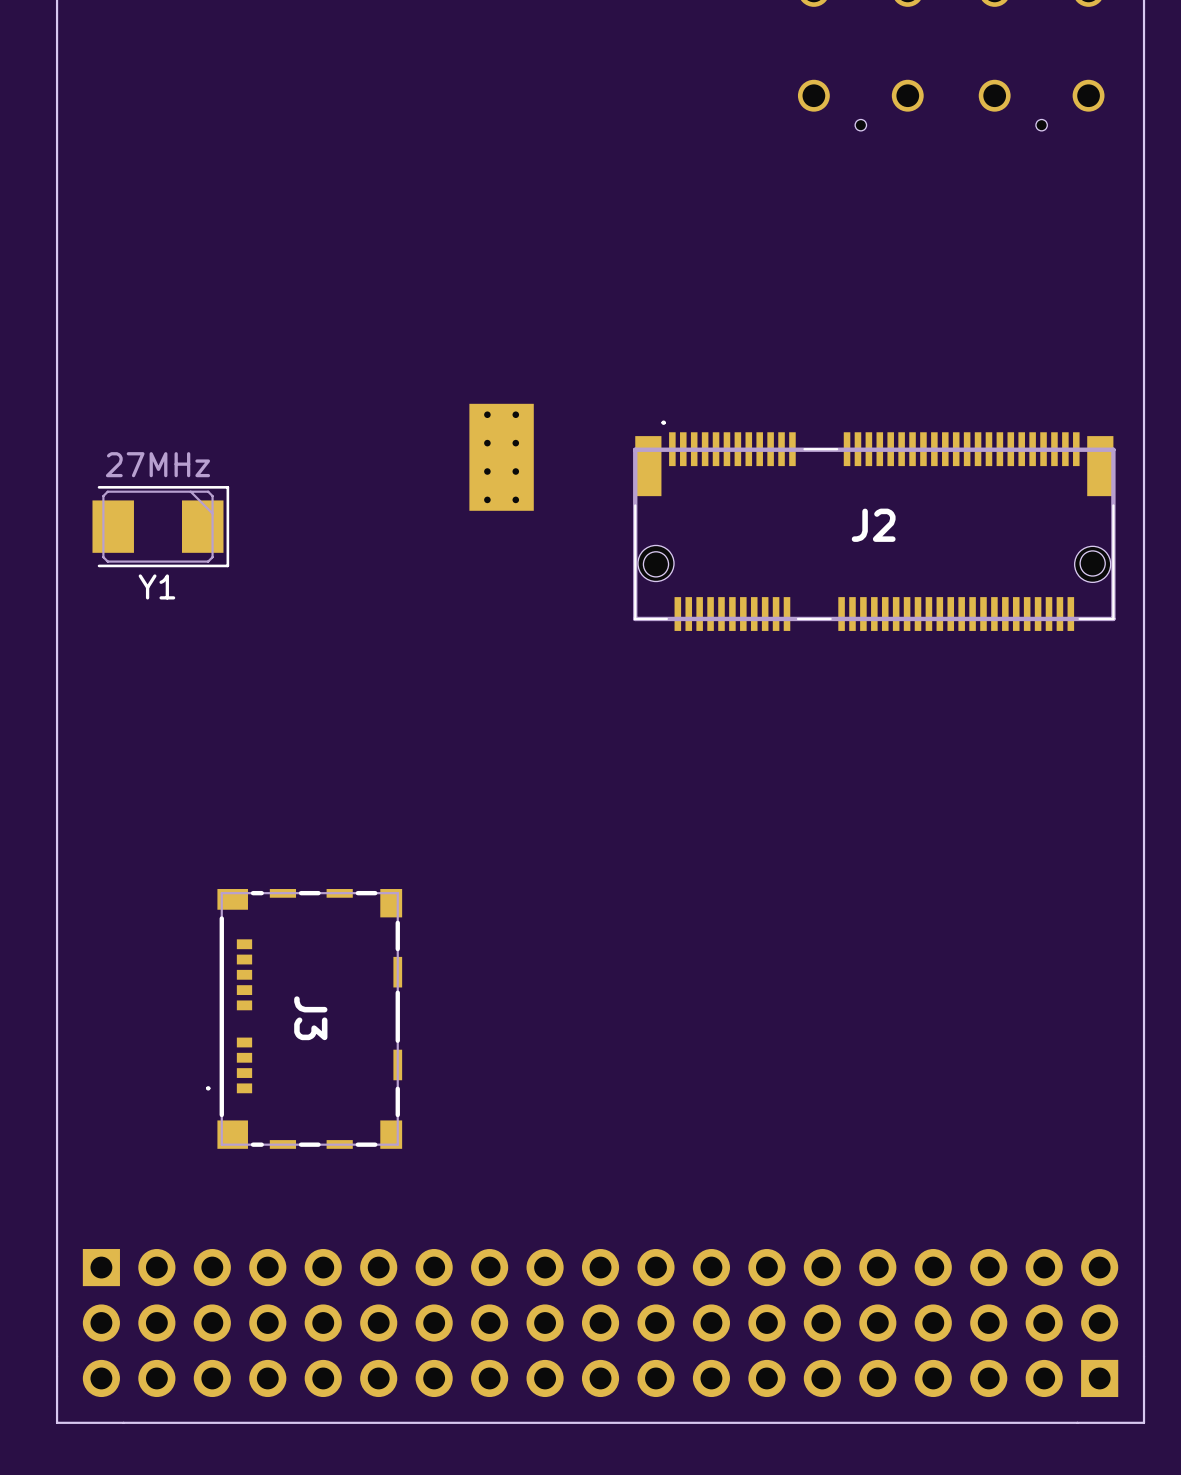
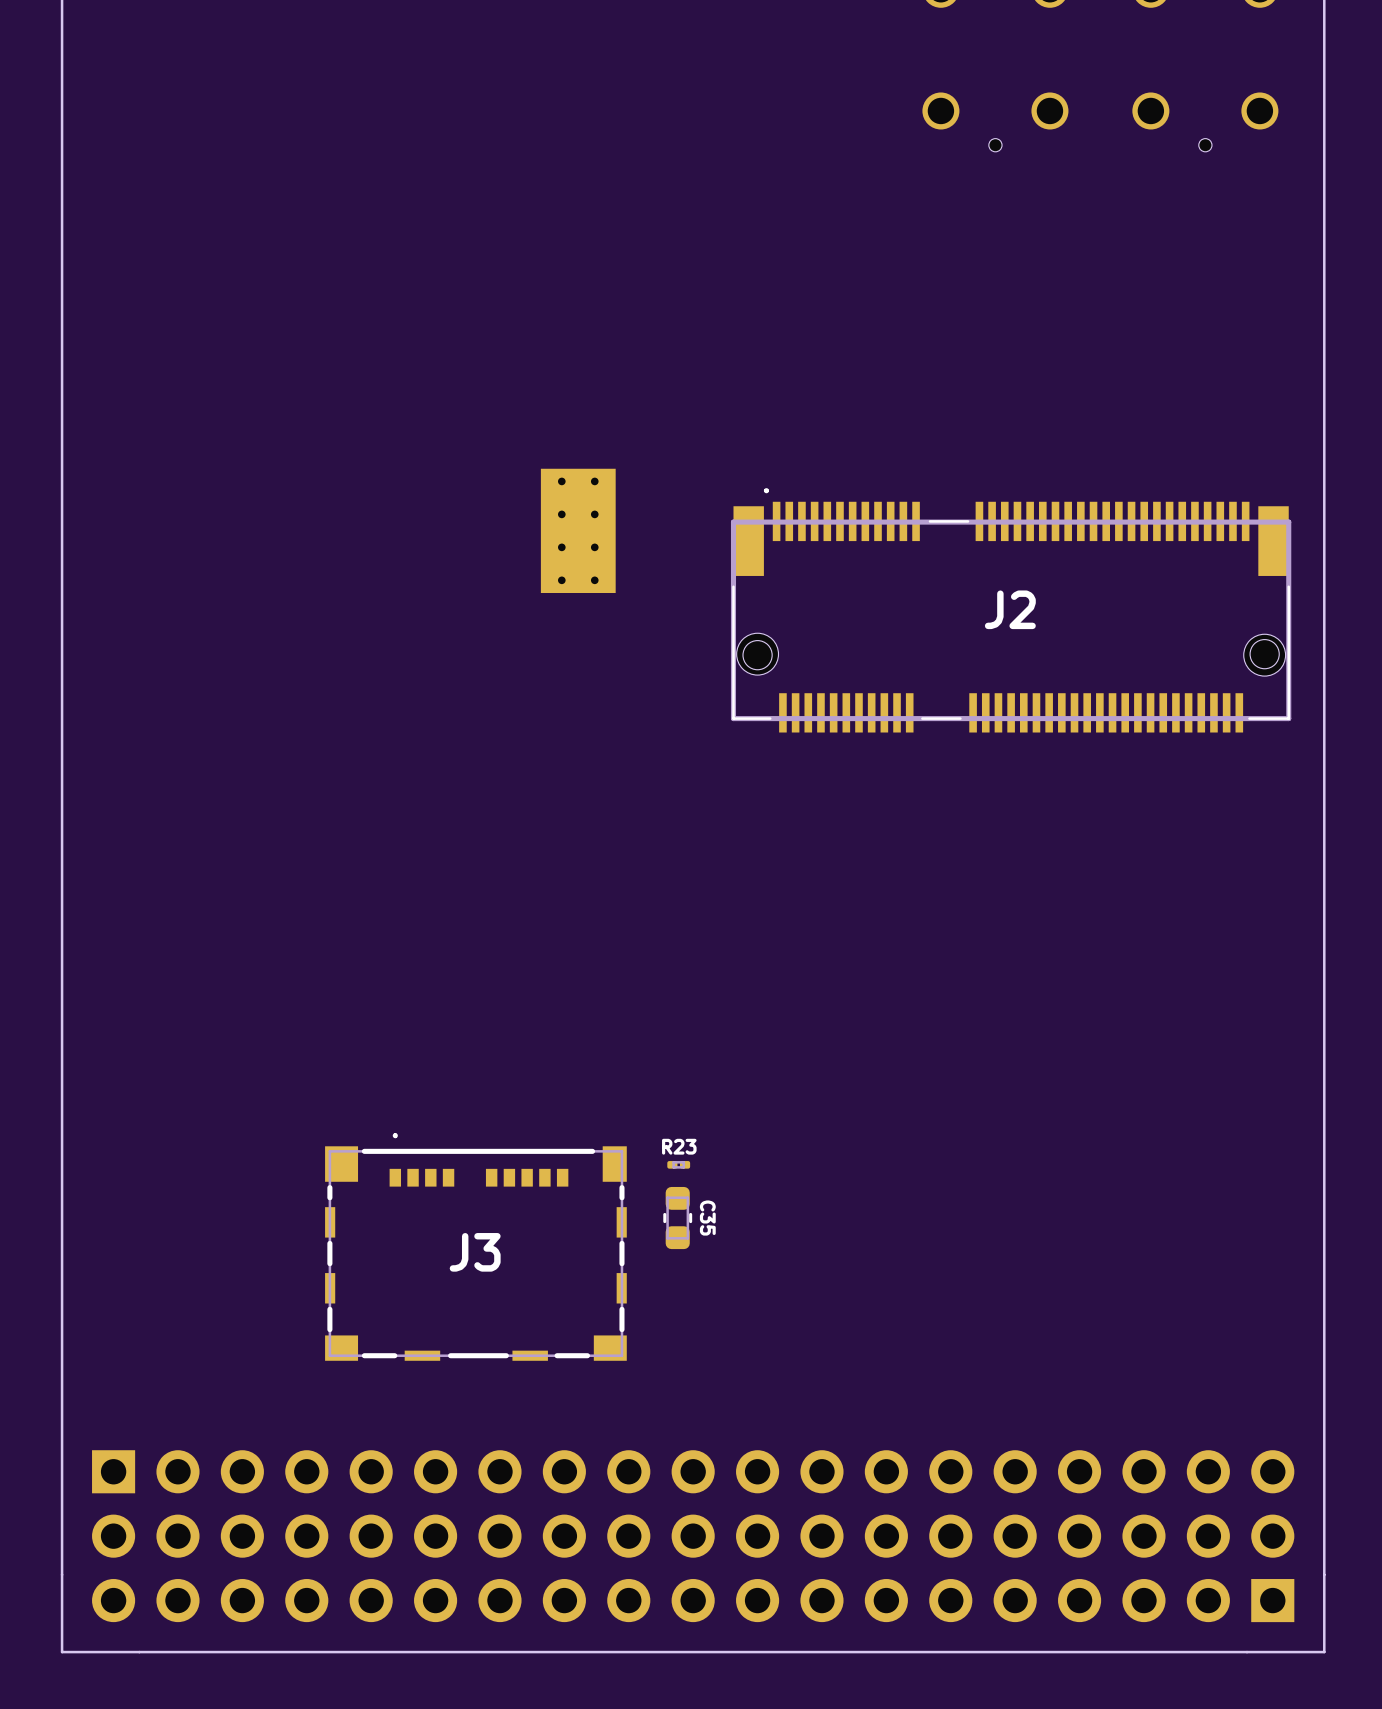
Y1: 27MHz (160, 526) -> none
R23: none -> (678, 1164)
J3 rotation: 0° (304, 1018) -> 90° clockwise (475, 1246)
C35: none -> (677, 1218)

